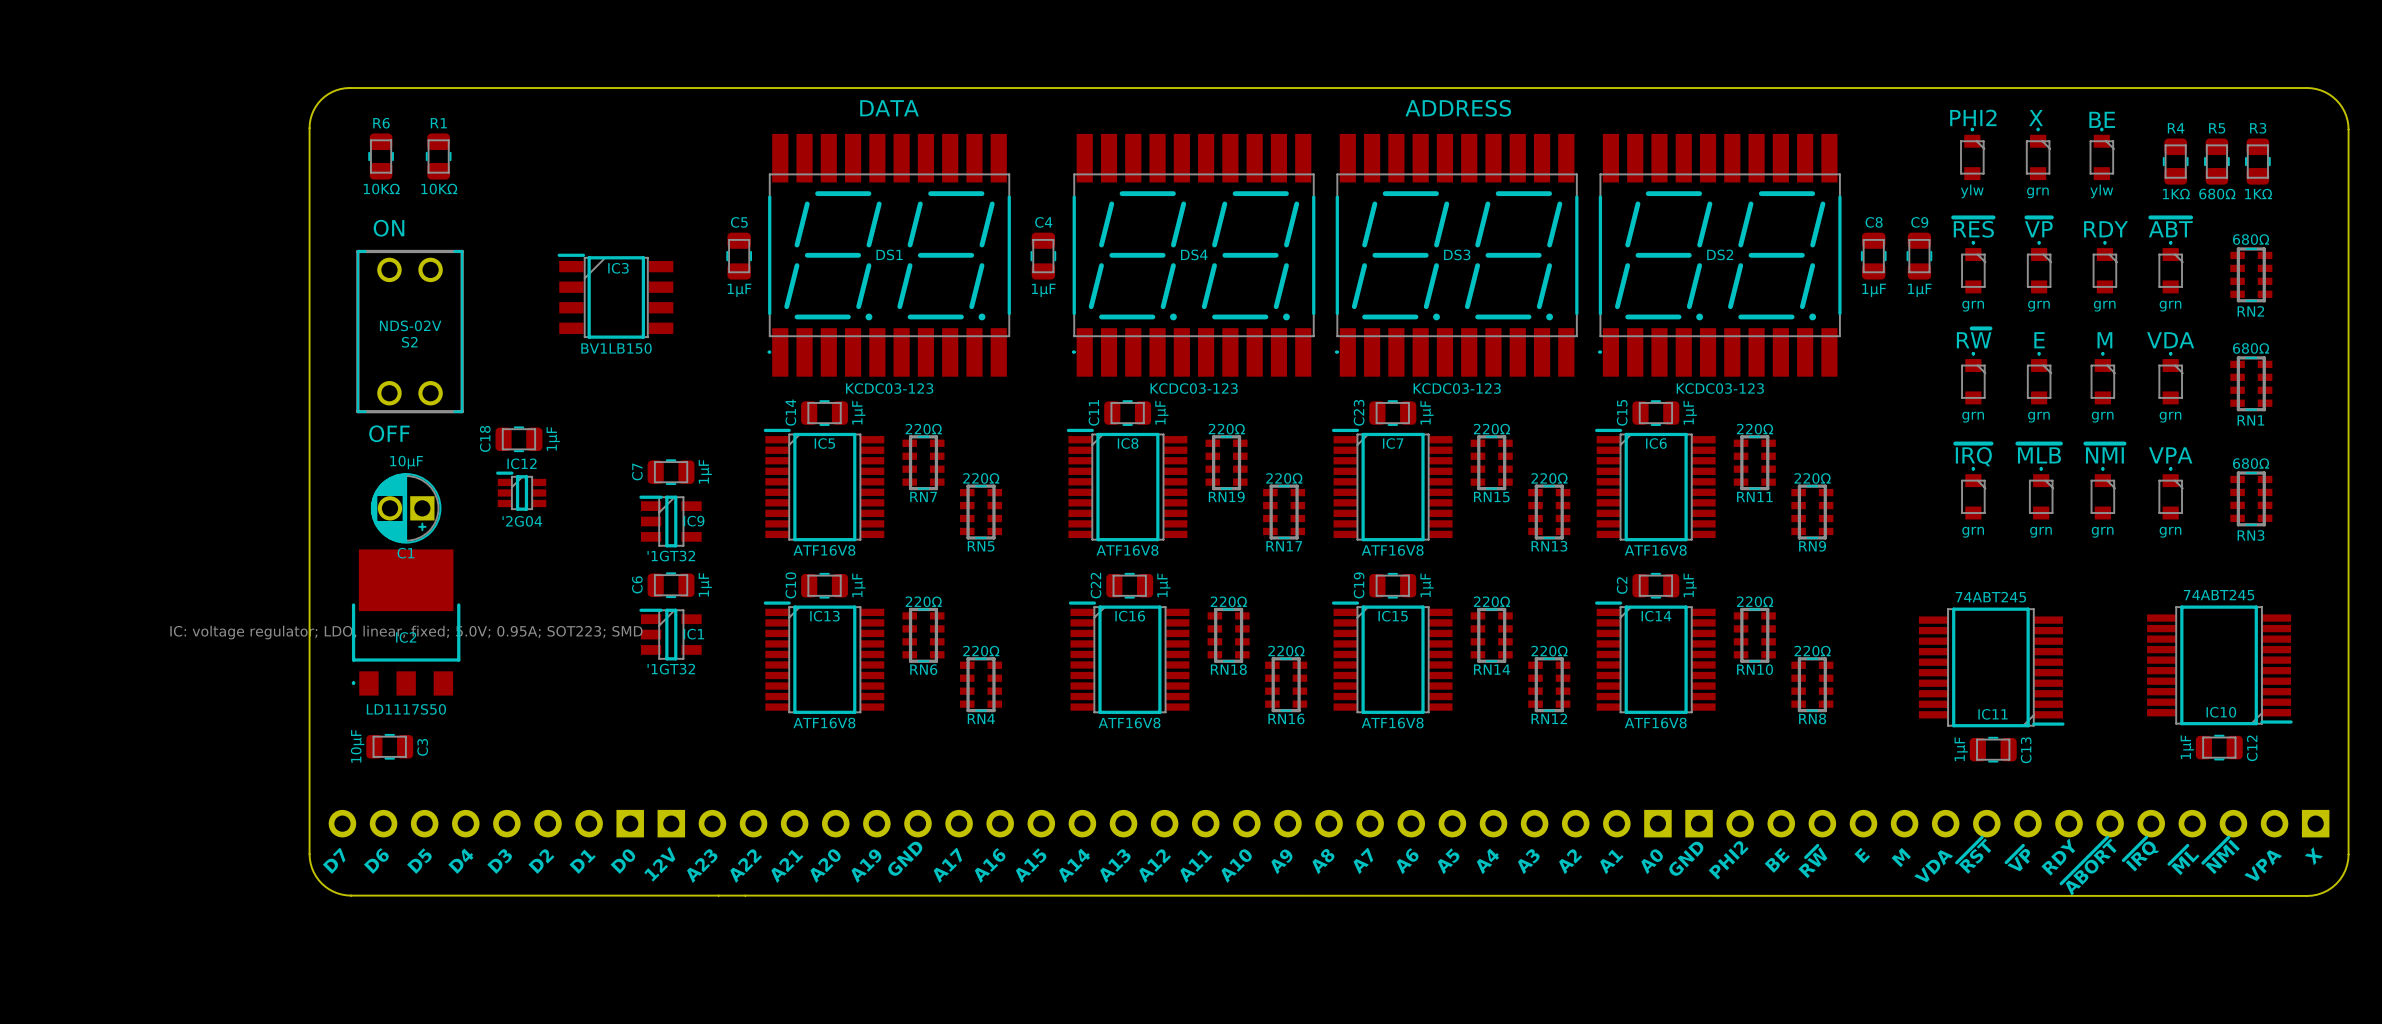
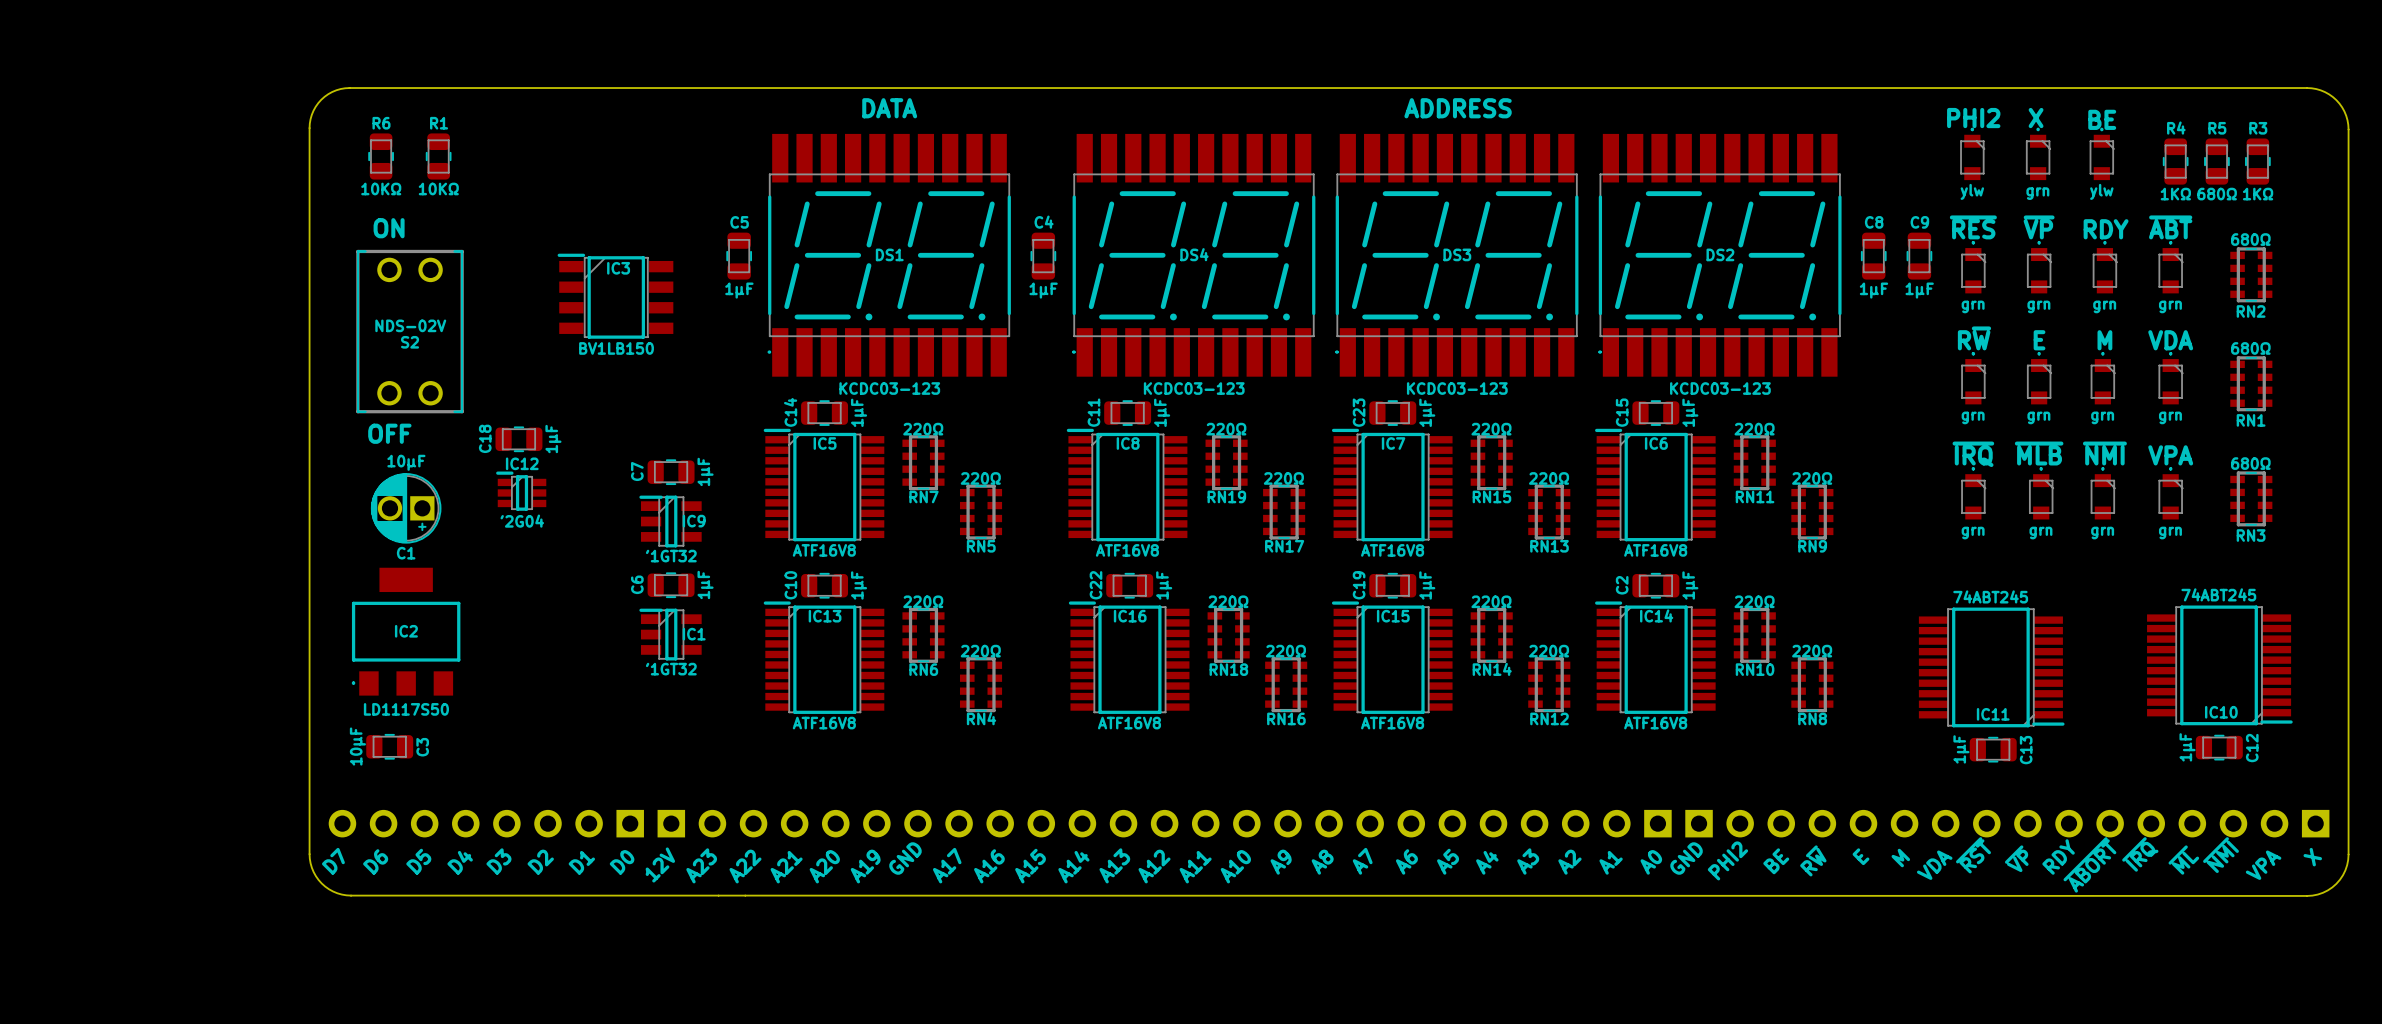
IC2 footprint: [351, 549, 461, 696] -> [351, 567, 461, 696]
IC2 text: IC: voltage regulator; LDO, linear, fixed; 5.0V; 0.95A; SOT223; SMD (406, 632) -> none

